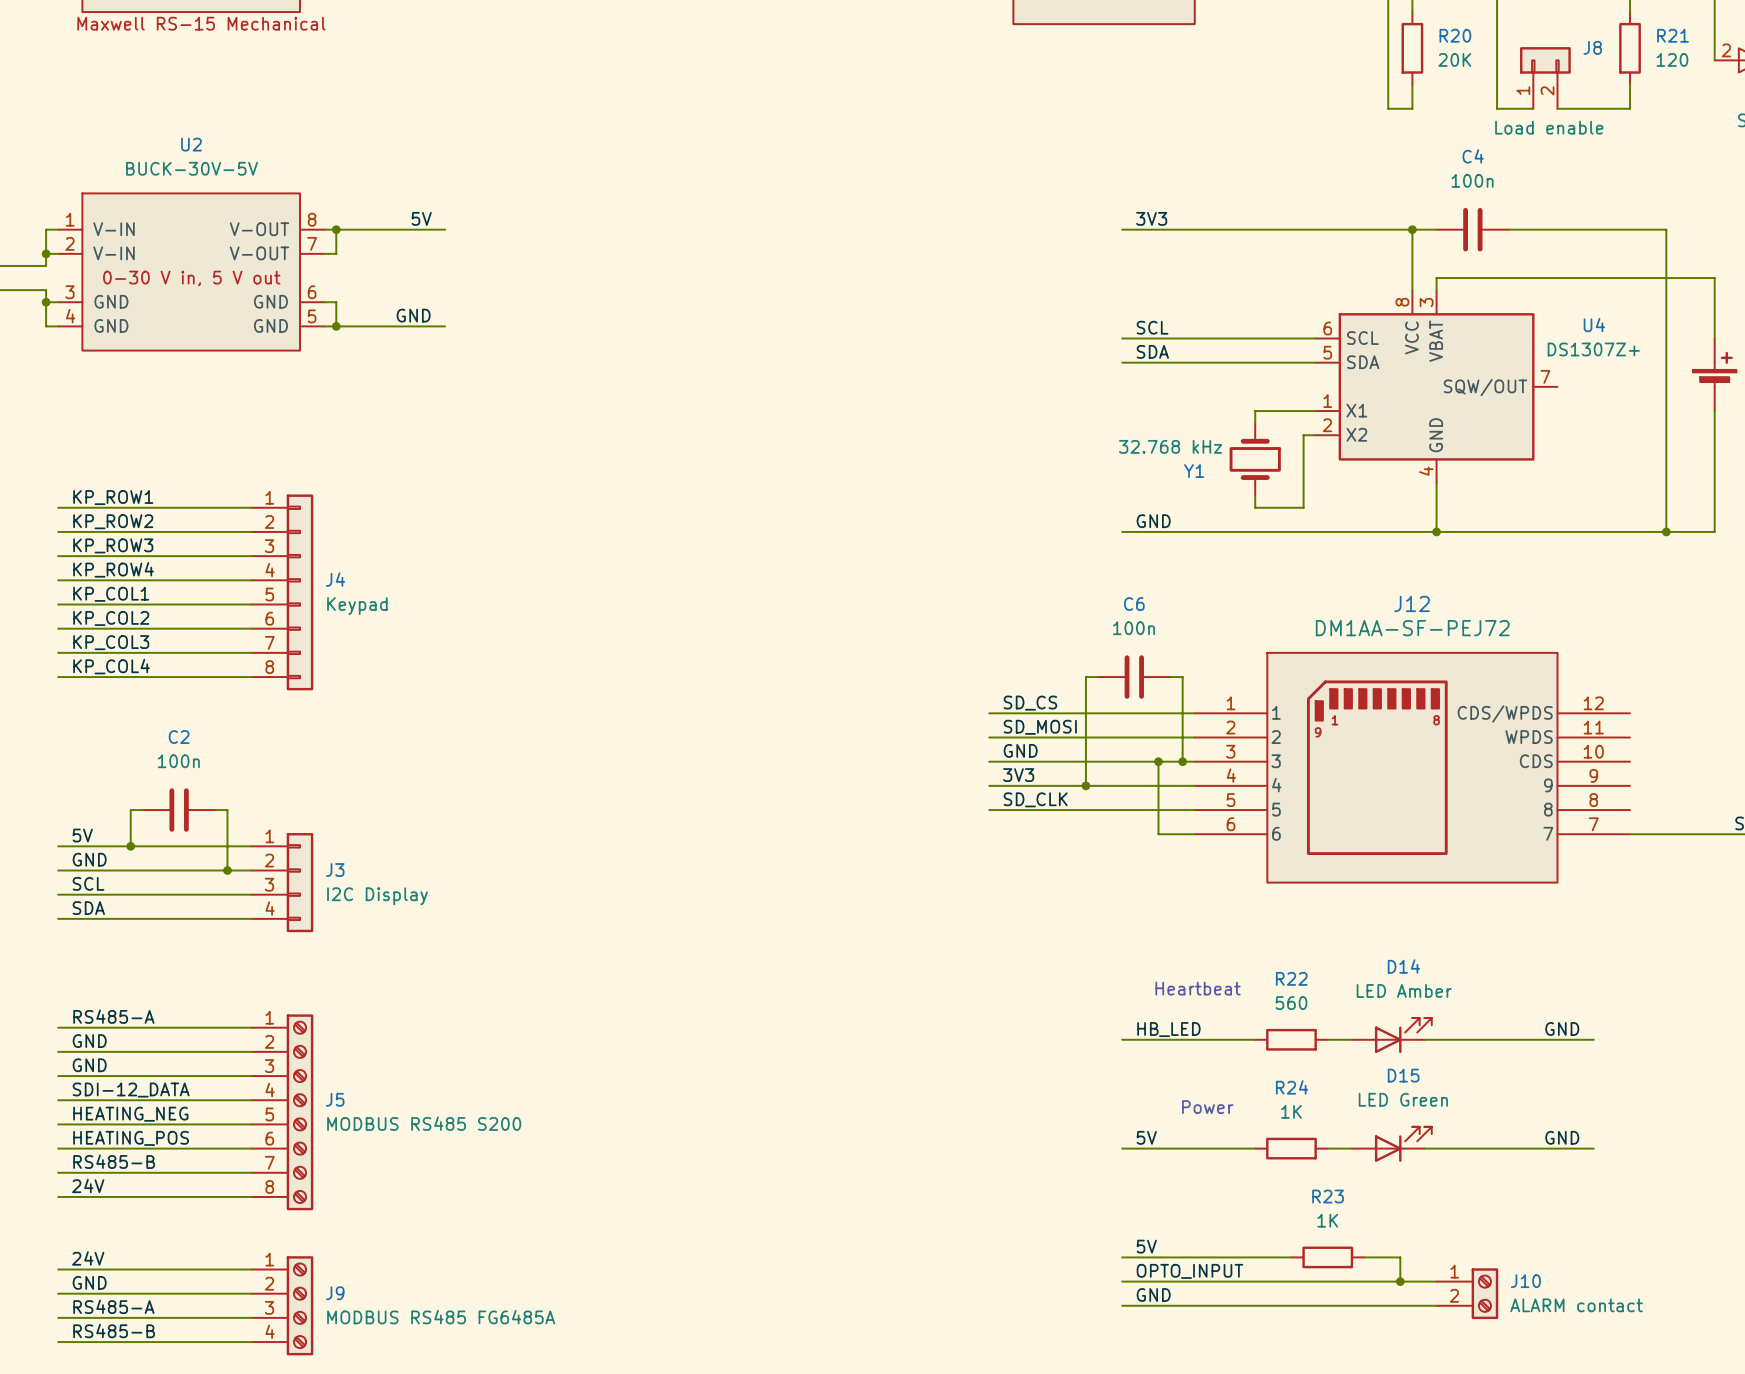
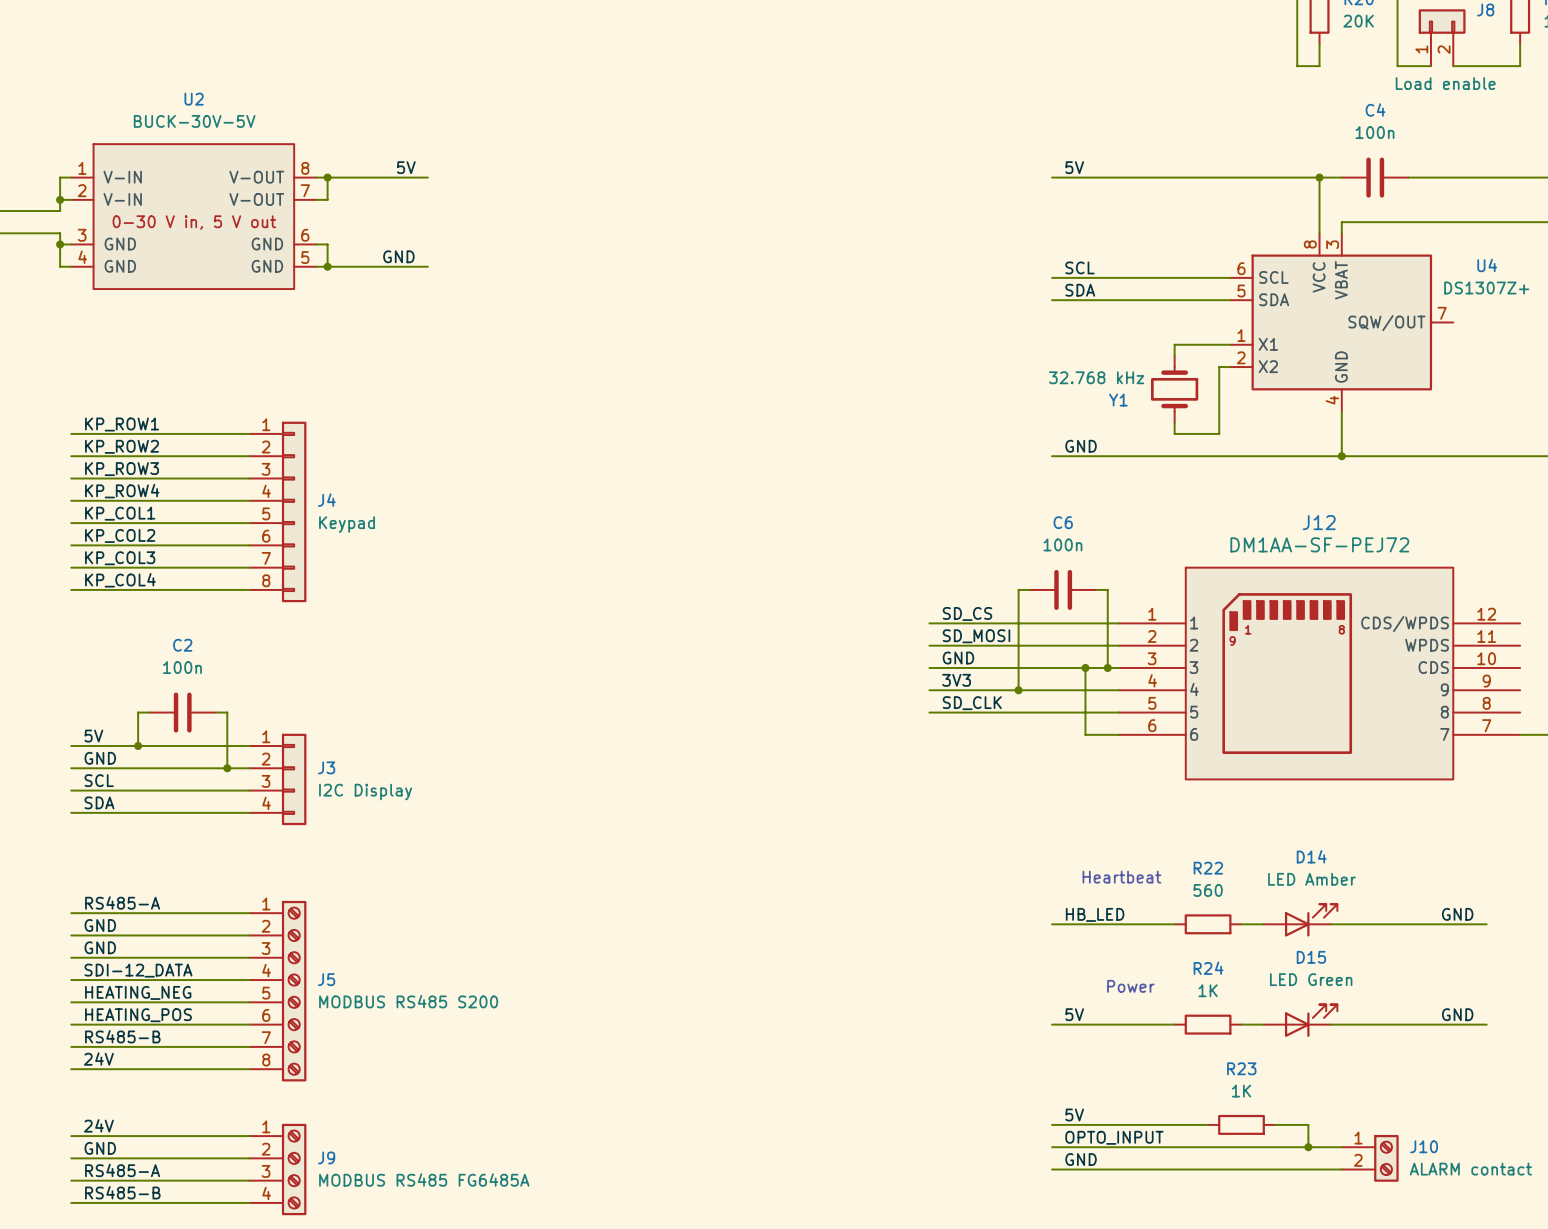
label: 3V3 (1151, 218) -> 5V (1074, 167)

